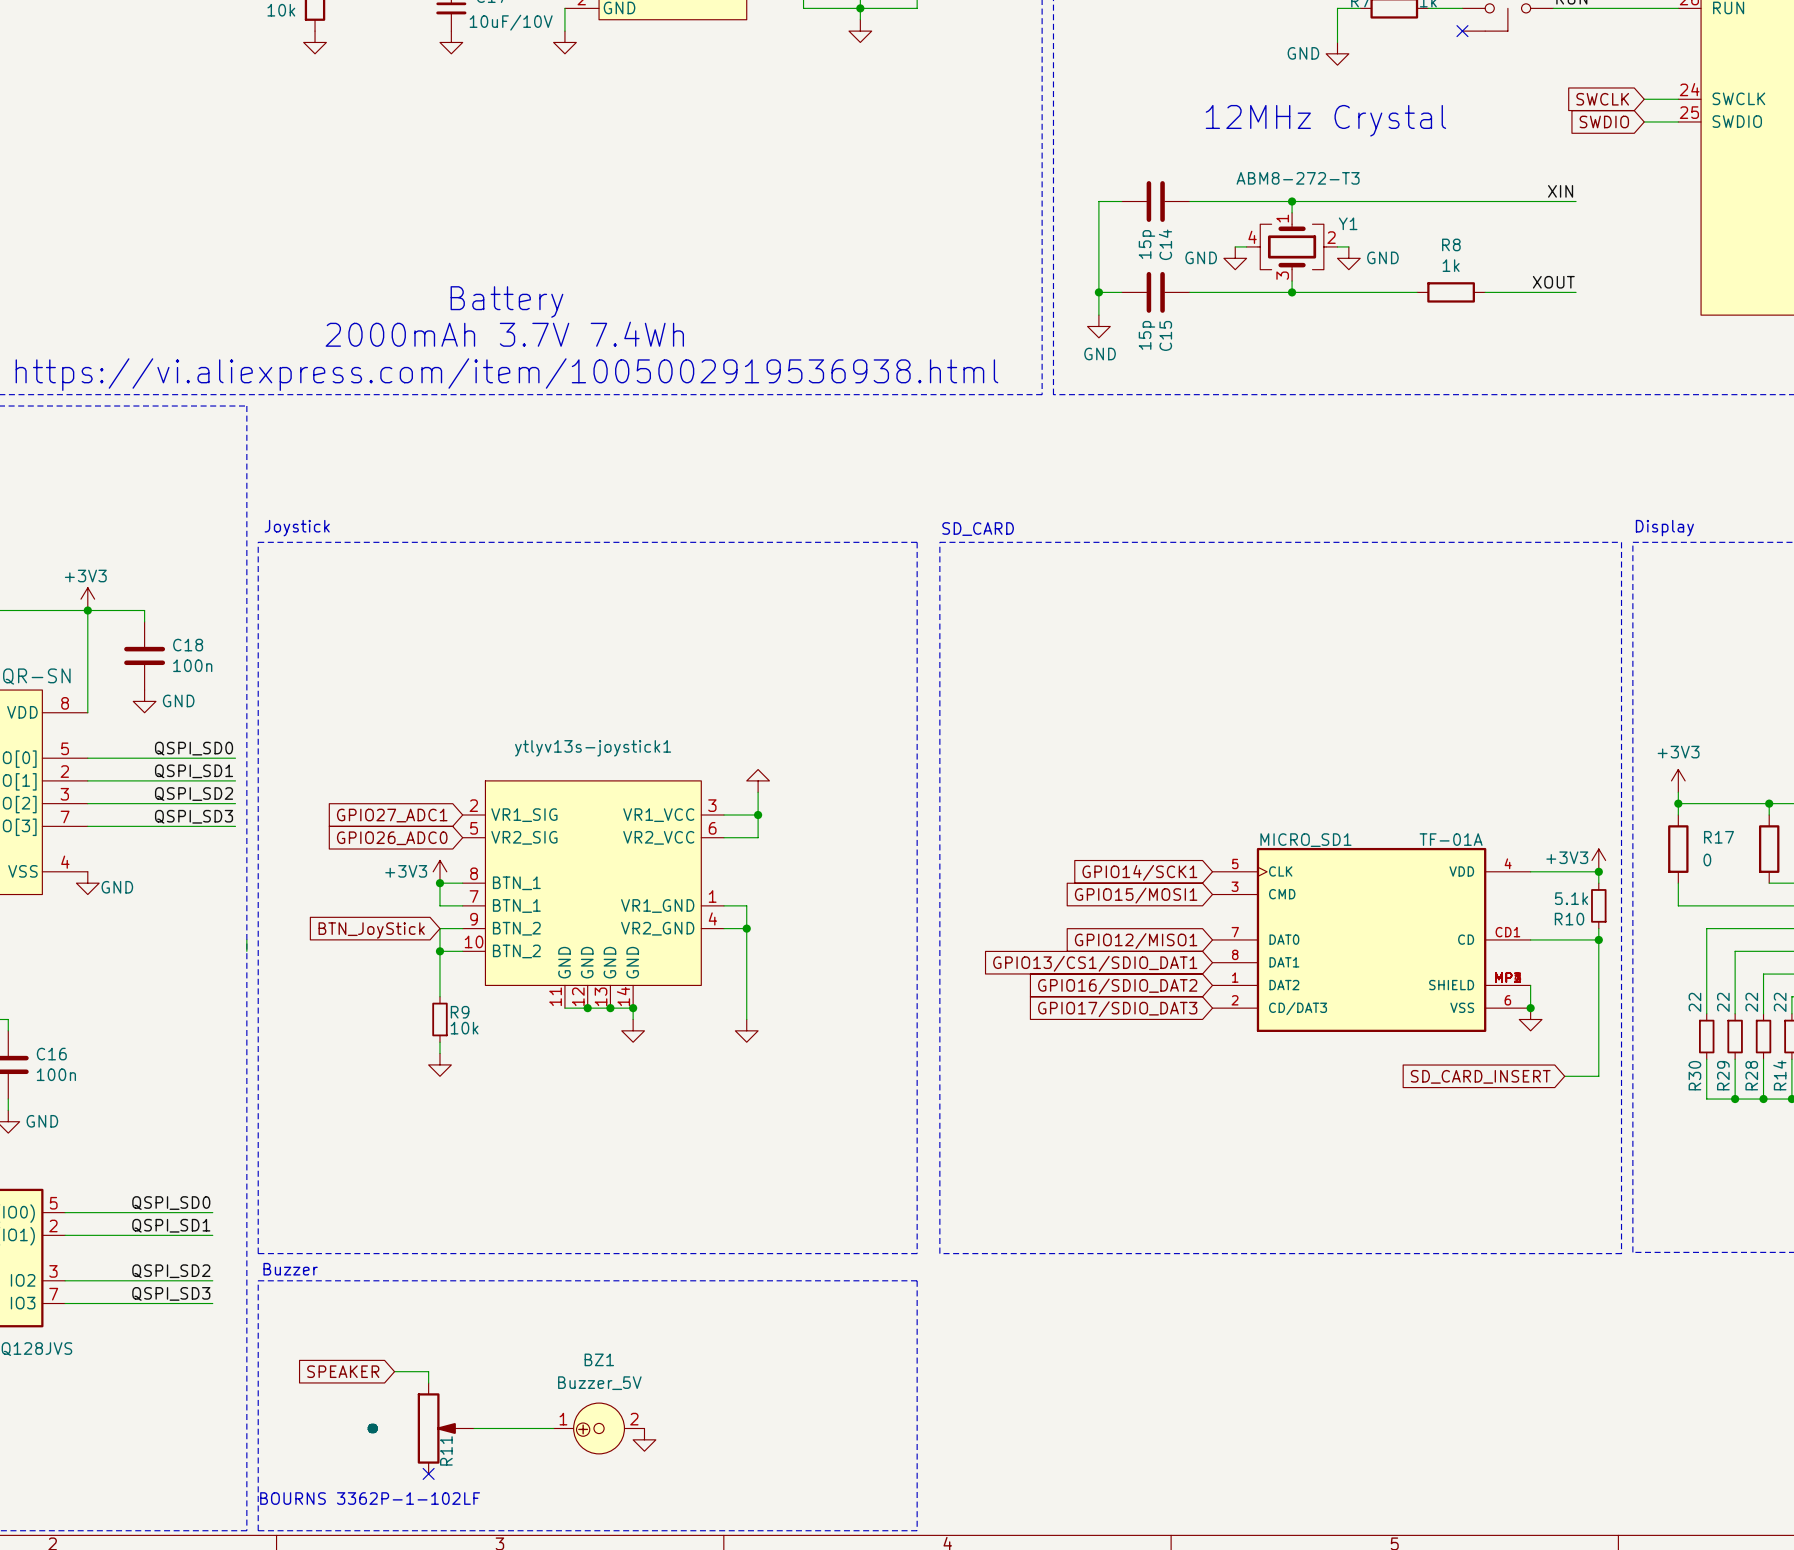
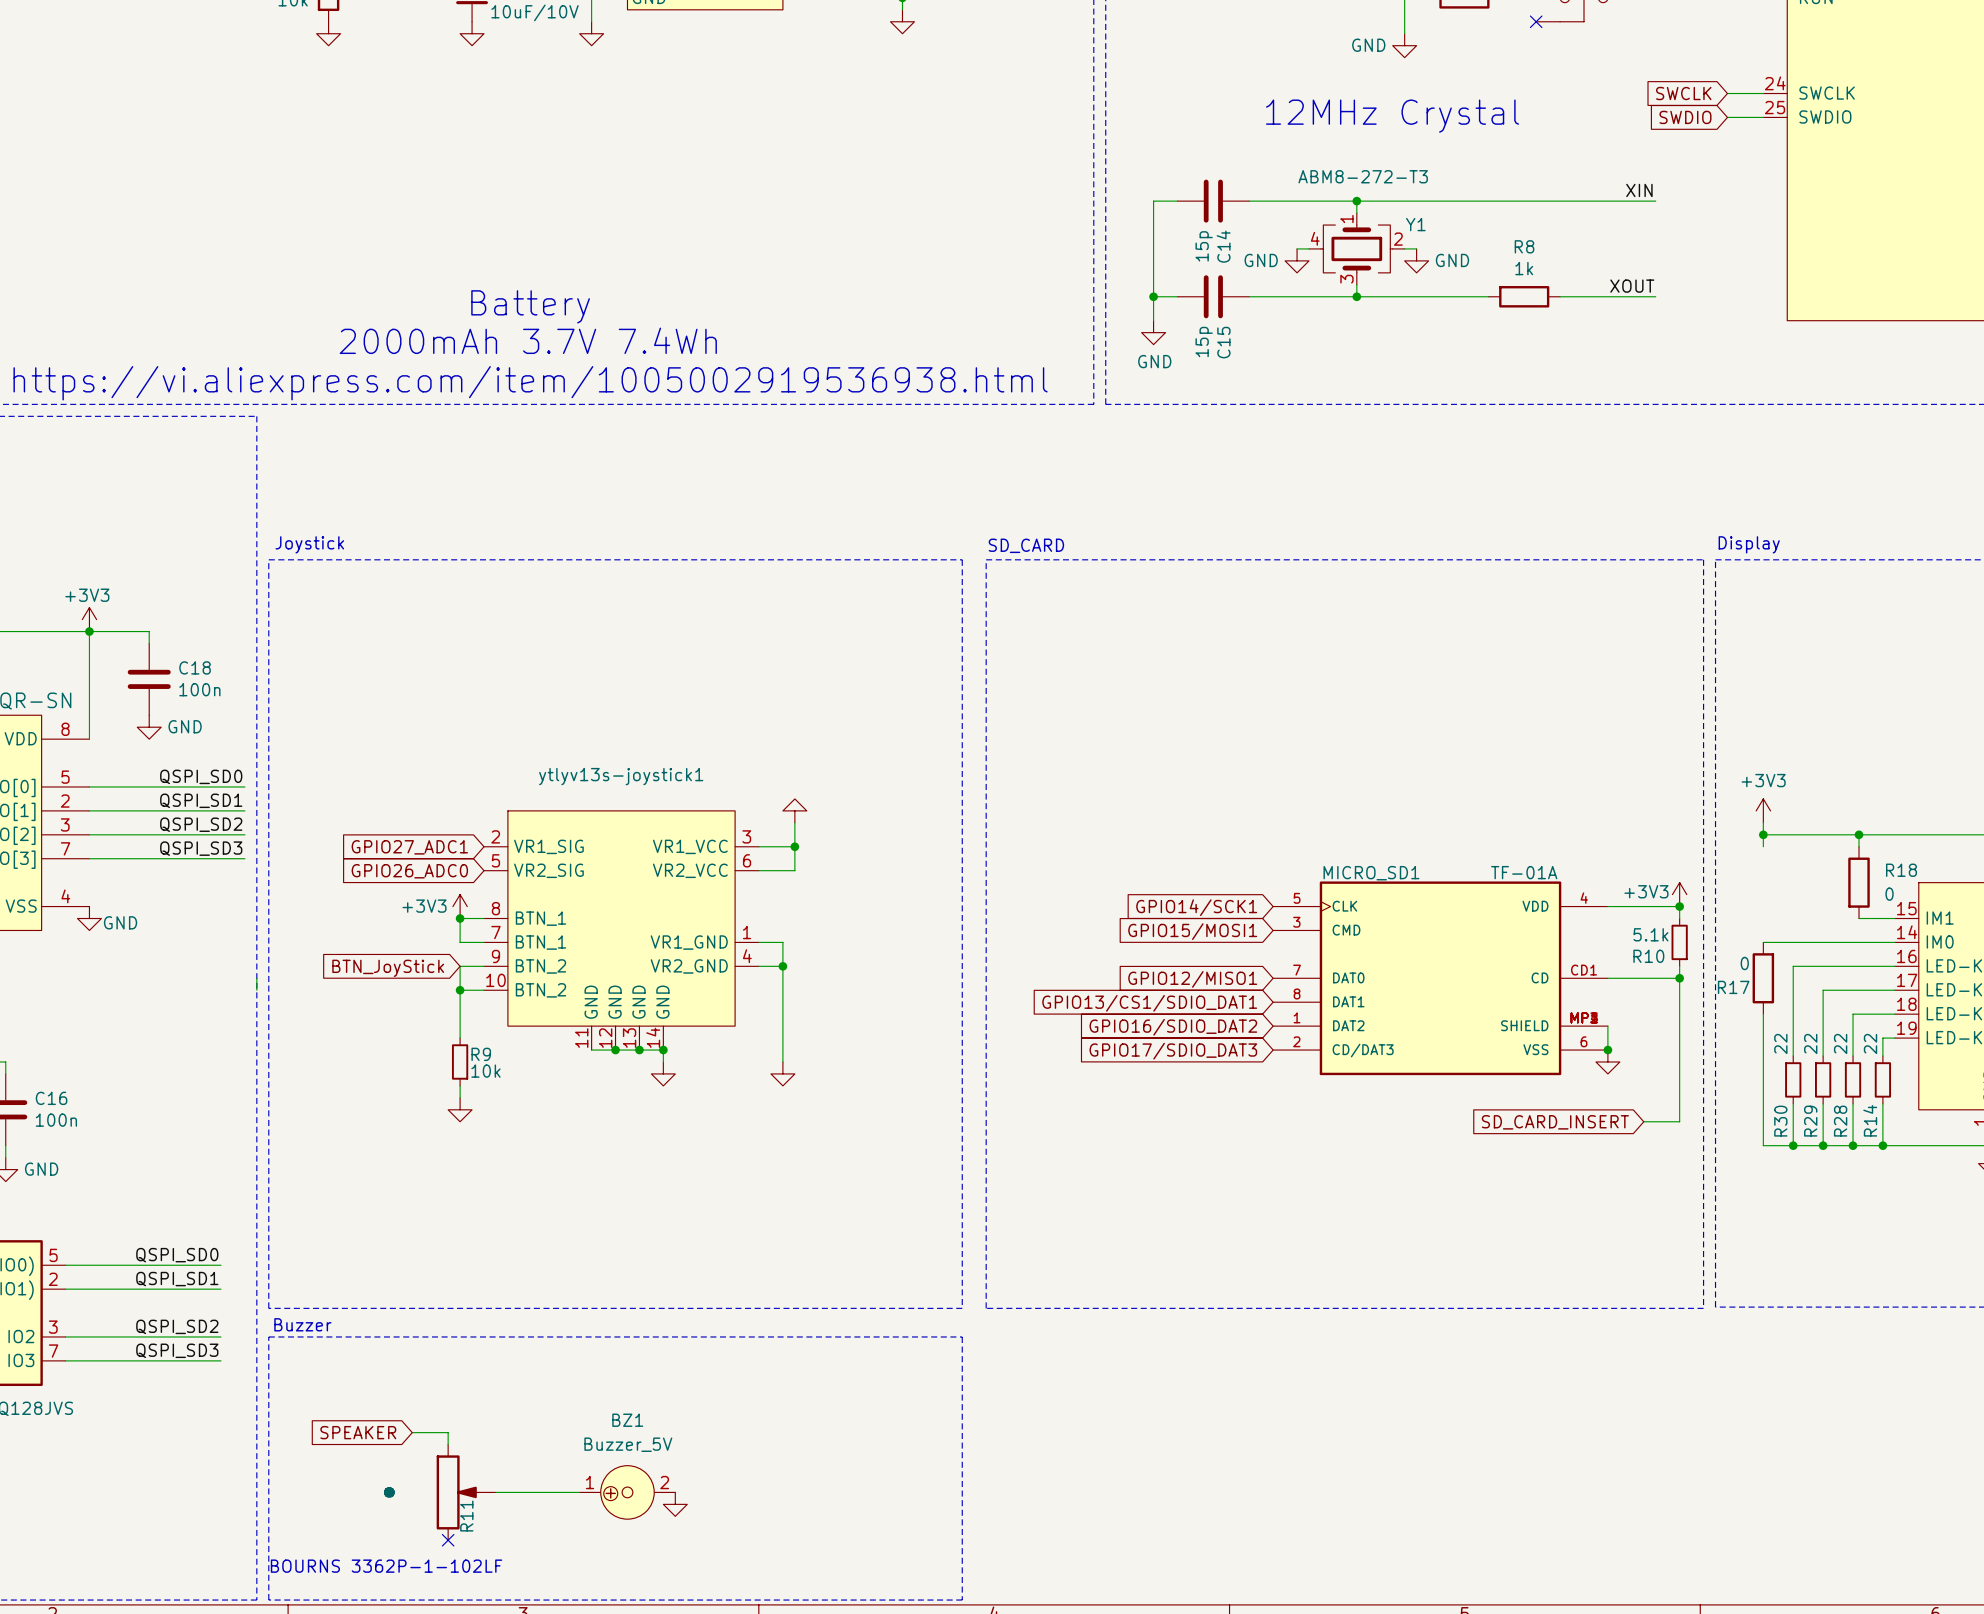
R17 name position: R17 (1718, 837) -> R17 (1733, 987)
R17 position: (1678, 849) -> (1763, 978)
R17 value position: 0 (1707, 860) -> 0 (1744, 963)
wire: (1678, 883) (1678, 905) -> none
wire: none -> (1763, 1014) (1763, 1145) (1793, 1145)
junction: none -> (1793, 1145)

